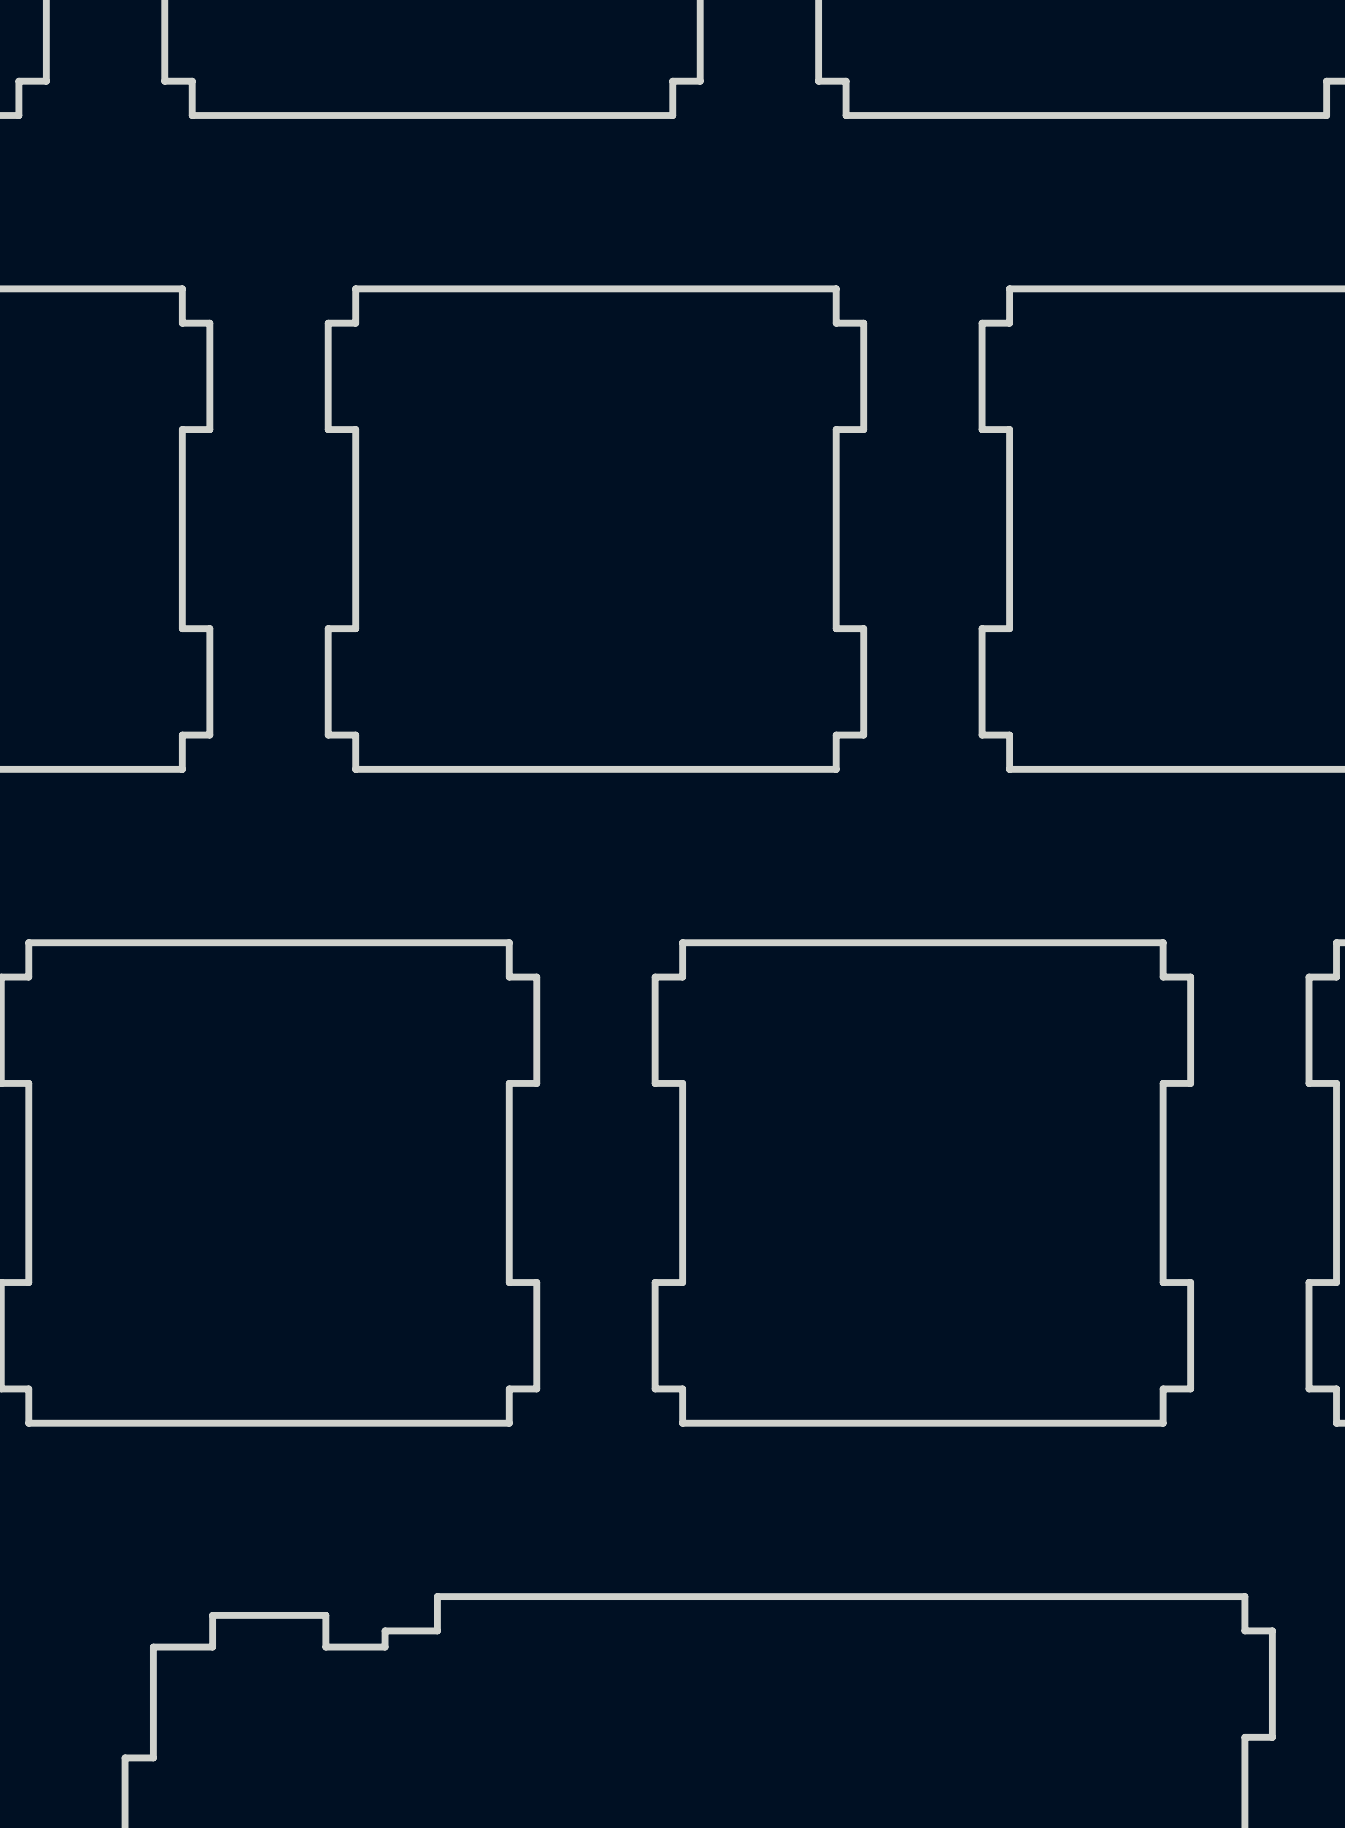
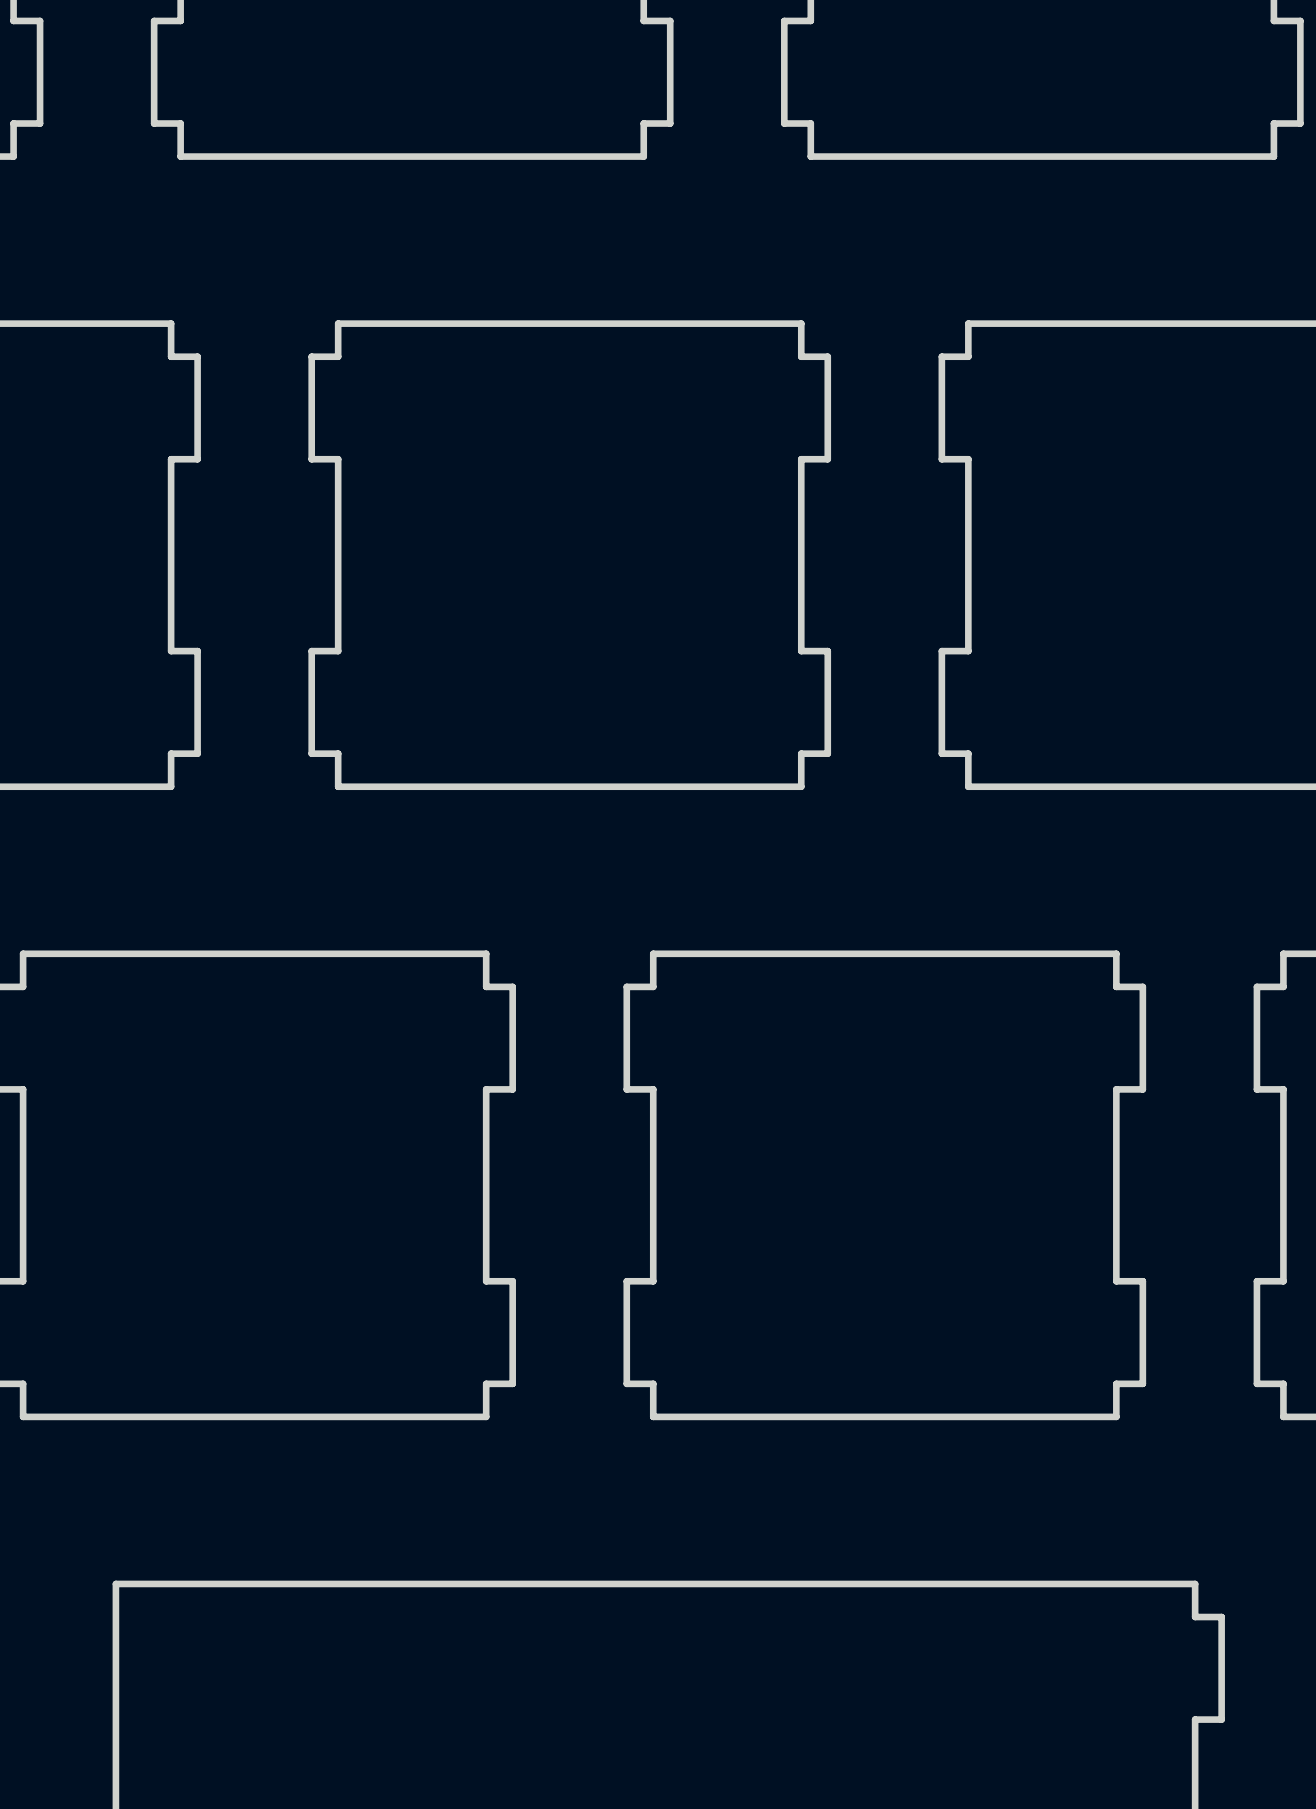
board edge: (437, 1596) (437, 1630) (385, 1630) (385, 1647) (325, 1647) (325, 1615) (212, 1615) (212, 1647) (153, 1647) (153, 1757) (125, 1757) -> (416, 1583) (115, 1583) (115, 1739)

